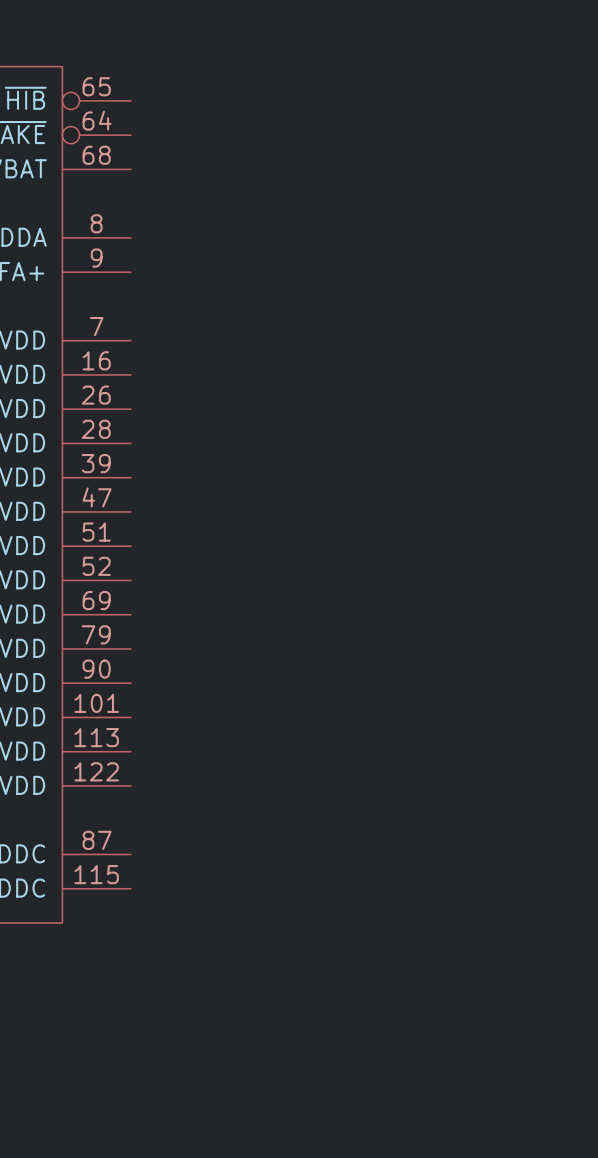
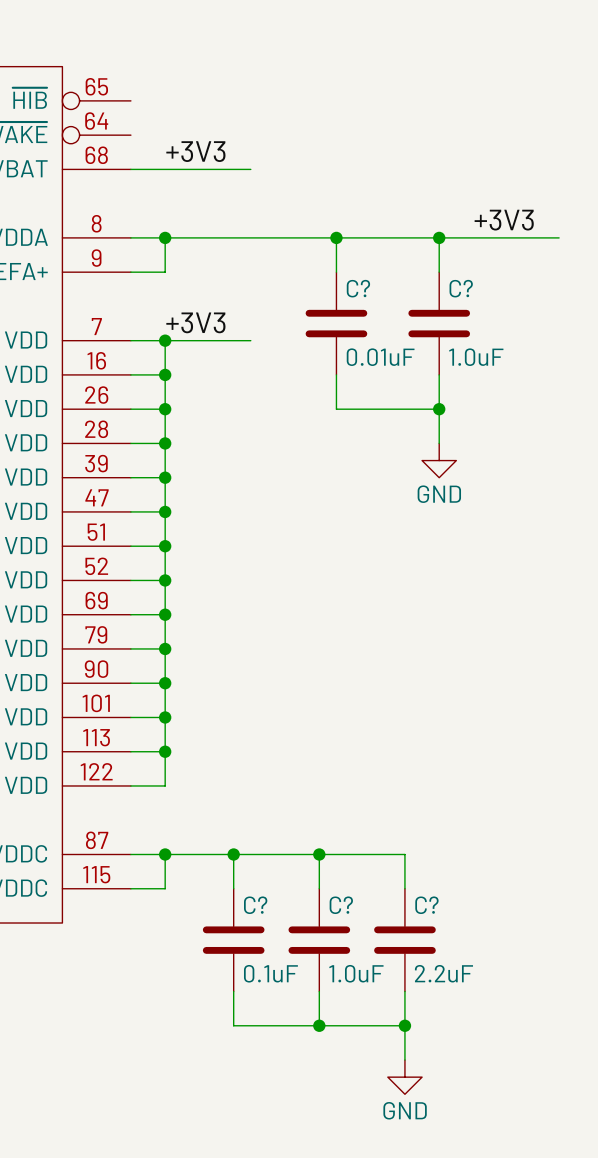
label: none -> +3V3 (195, 151)
wire: none -> (130, 169) (250, 169)
label: none -> +3V3 (504, 220)
wire: none -> (130, 237) (559, 237)
wire: none -> (165, 237) (165, 272) (130, 272)
junction: none -> (165, 237)
wire: none -> (336, 237) (336, 272)
junction: none -> (336, 237)
wire: none -> (439, 237) (439, 272)
junction: none -> (439, 237)
label: none -> +3V3 (195, 322)
C?: none -> 0.01uF (336, 323)
C?: none -> 1.0uF (439, 323)
wire: none -> (130, 340) (250, 340)
wire: none -> (165, 340) (165, 785) (130, 785)
junction: none -> (165, 340)
wire: none -> (130, 374) (165, 374)
junction: none -> (165, 374)
wire: none -> (336, 374) (336, 409) (439, 409)
wire: none -> (439, 374) (439, 443)
wire: none -> (130, 409) (165, 409)
junction: none -> (165, 409)
junction: none -> (439, 409)
wire: none -> (130, 443) (165, 443)
junction: none -> (165, 443)
power symbol: none -> GND (439, 460)
wire: none -> (130, 477) (165, 477)
junction: none -> (165, 477)
wire: none -> (130, 511) (165, 511)
junction: none -> (165, 511)
wire: none -> (130, 546) (165, 546)
junction: none -> (165, 546)
wire: none -> (130, 580) (165, 580)
junction: none -> (165, 580)
wire: none -> (130, 614) (165, 614)
junction: none -> (165, 614)
wire: none -> (130, 648) (165, 648)
junction: none -> (165, 648)
wire: none -> (130, 683) (165, 683)
junction: none -> (165, 683)
wire: none -> (130, 717) (165, 717)
junction: none -> (165, 717)
wire: none -> (130, 751) (165, 751)
junction: none -> (165, 751)
wire: none -> (130, 854) (404, 854) (404, 888)
wire: none -> (165, 854) (165, 888) (130, 888)
junction: none -> (165, 854)
wire: none -> (233, 854) (233, 888)
junction: none -> (233, 854)
wire: none -> (319, 854) (319, 888)
junction: none -> (319, 854)
C?: none -> 0.1uF (233, 940)
C?: none -> 1.0uF (319, 940)
C?: none -> 2.2uF (404, 940)
wire: none -> (233, 991) (233, 1025) (404, 1025)
wire: none -> (319, 991) (319, 1025)
wire: none -> (404, 991) (404, 1060)
junction: none -> (319, 1025)
junction: none -> (404, 1025)
power symbol: none -> GND (404, 1077)

